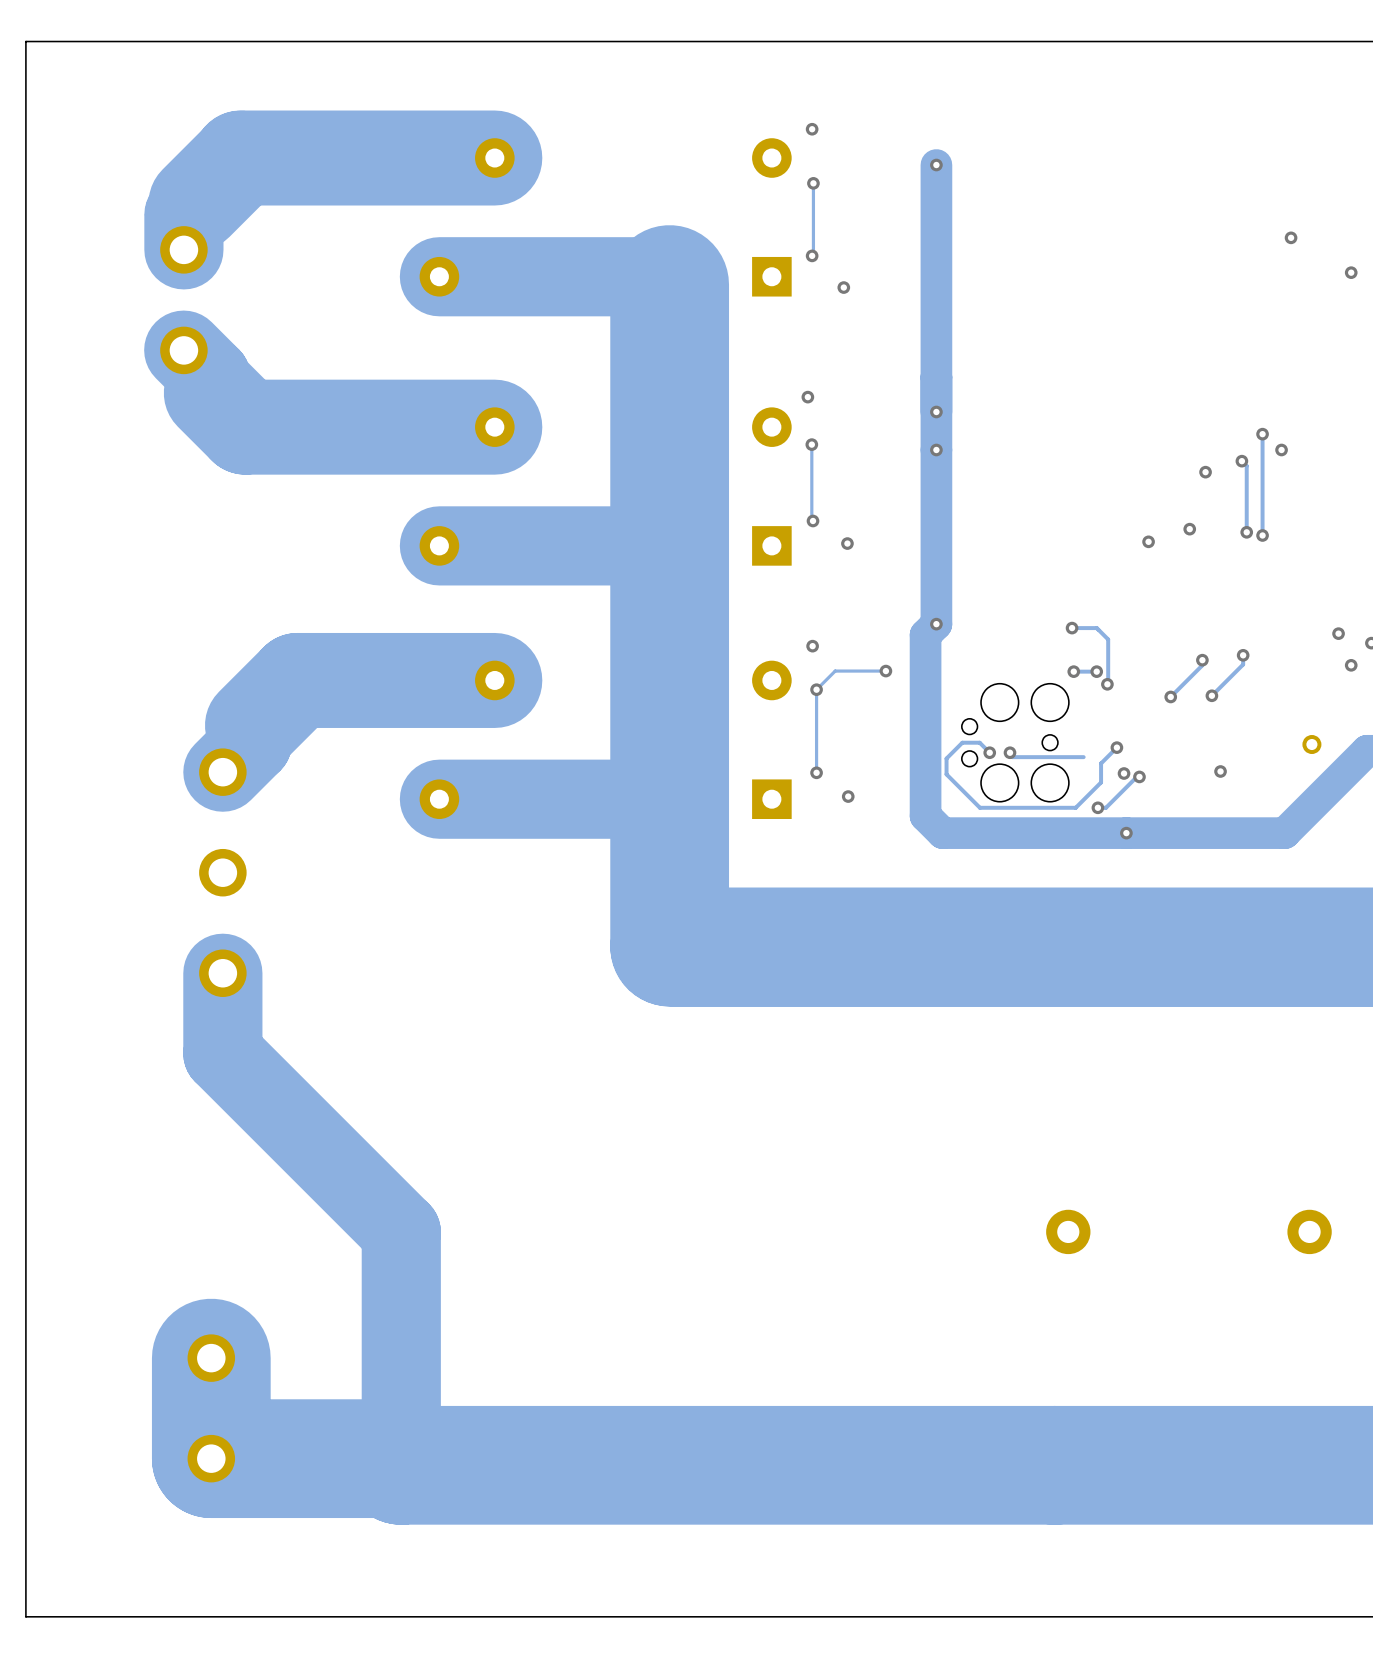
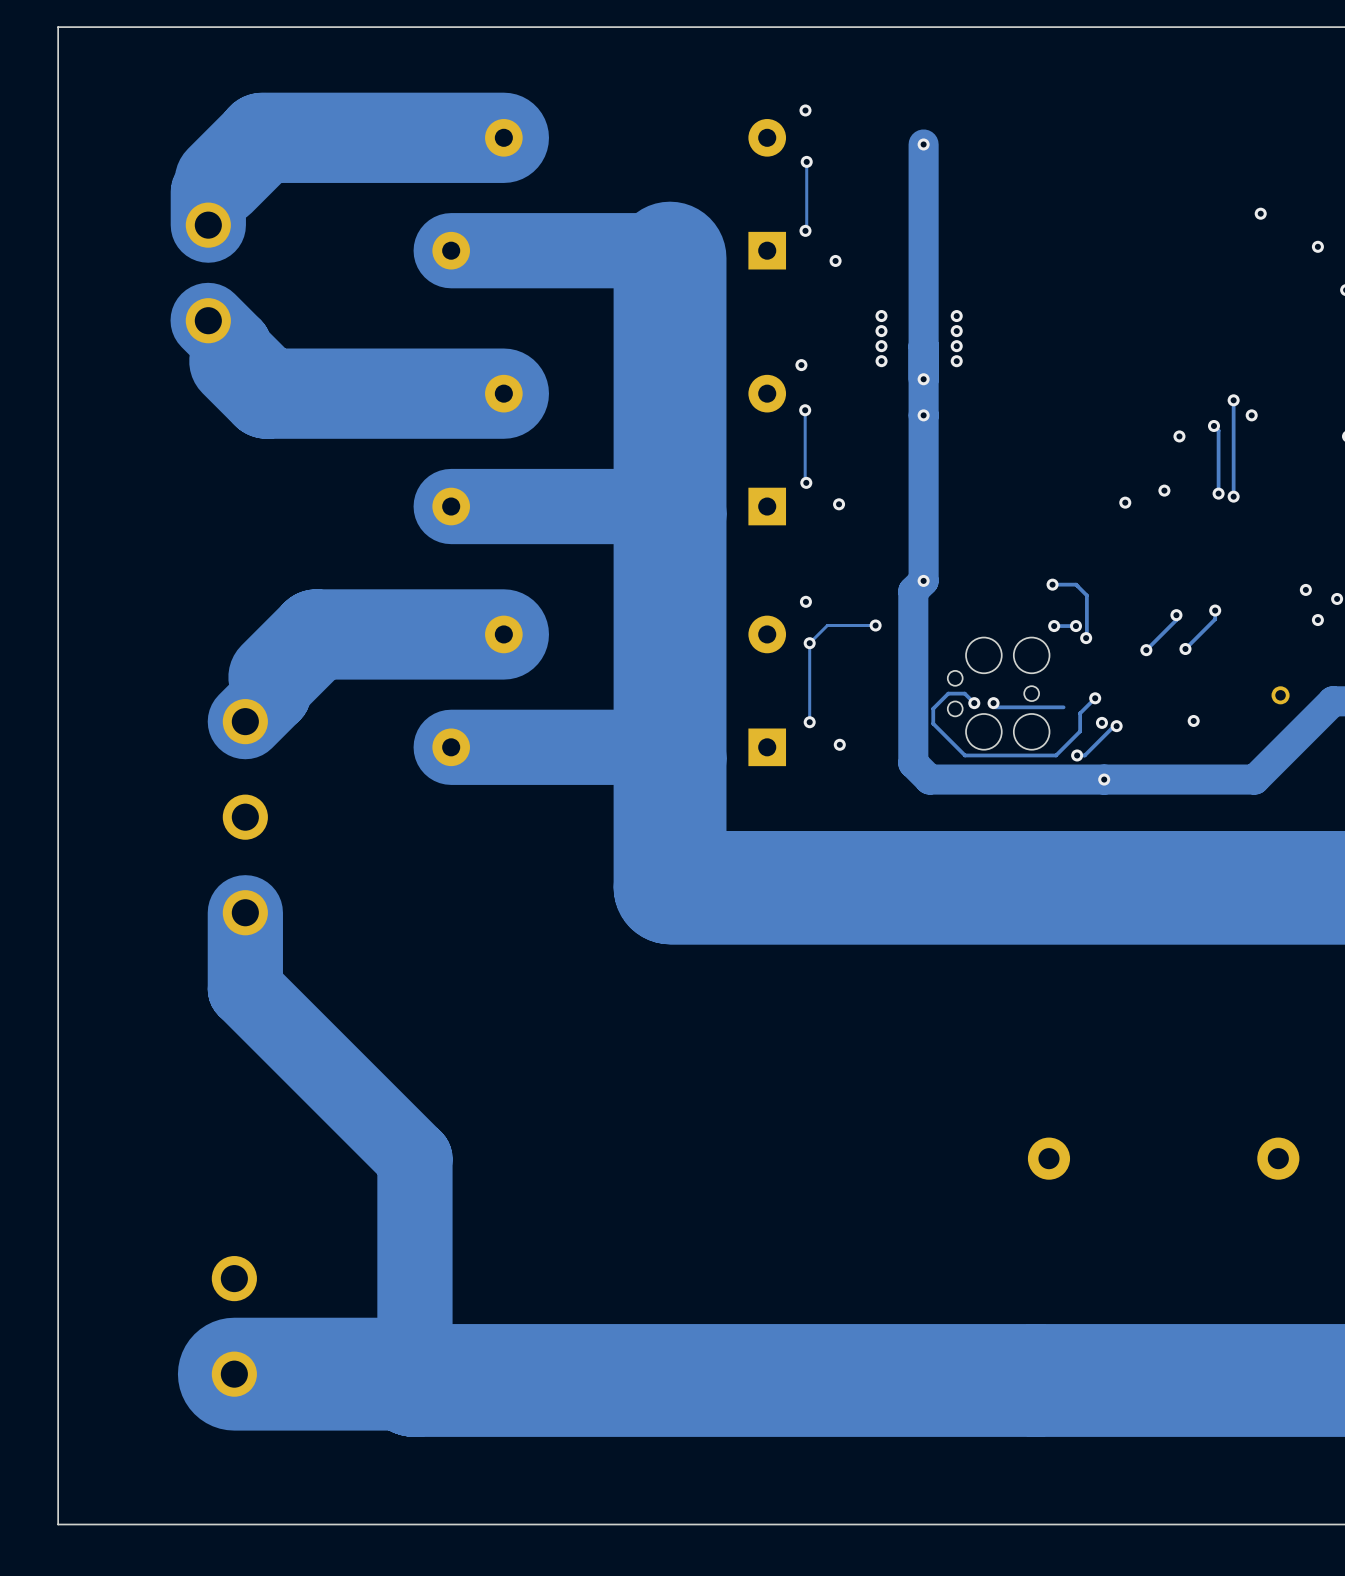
via: none -> (881, 316)
via: none -> (956, 316)
via: none -> (881, 331)
via: none -> (956, 331)
via: none -> (881, 346)
via: none -> (956, 346)
via: none -> (881, 361)
via: none -> (956, 361)
track: (211, 1358) (211, 1458) -> none

